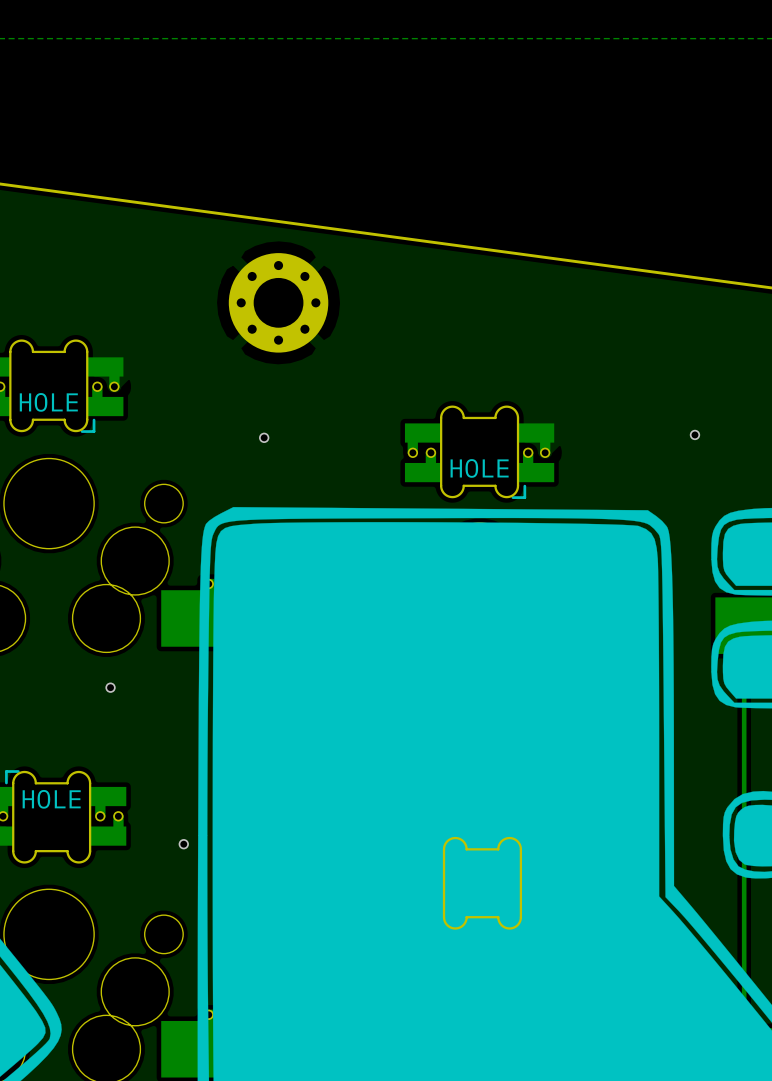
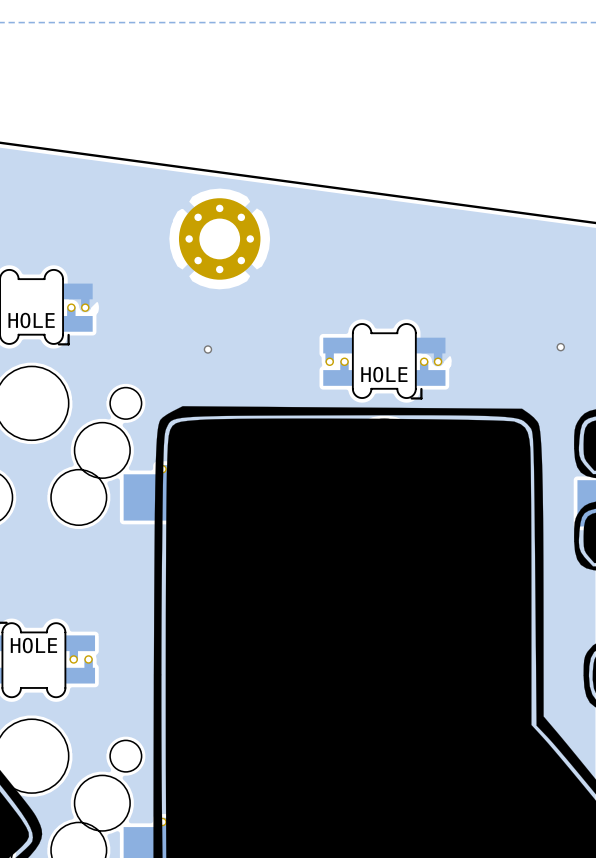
via: (110, 687) -> none
via: (183, 844) -> none

